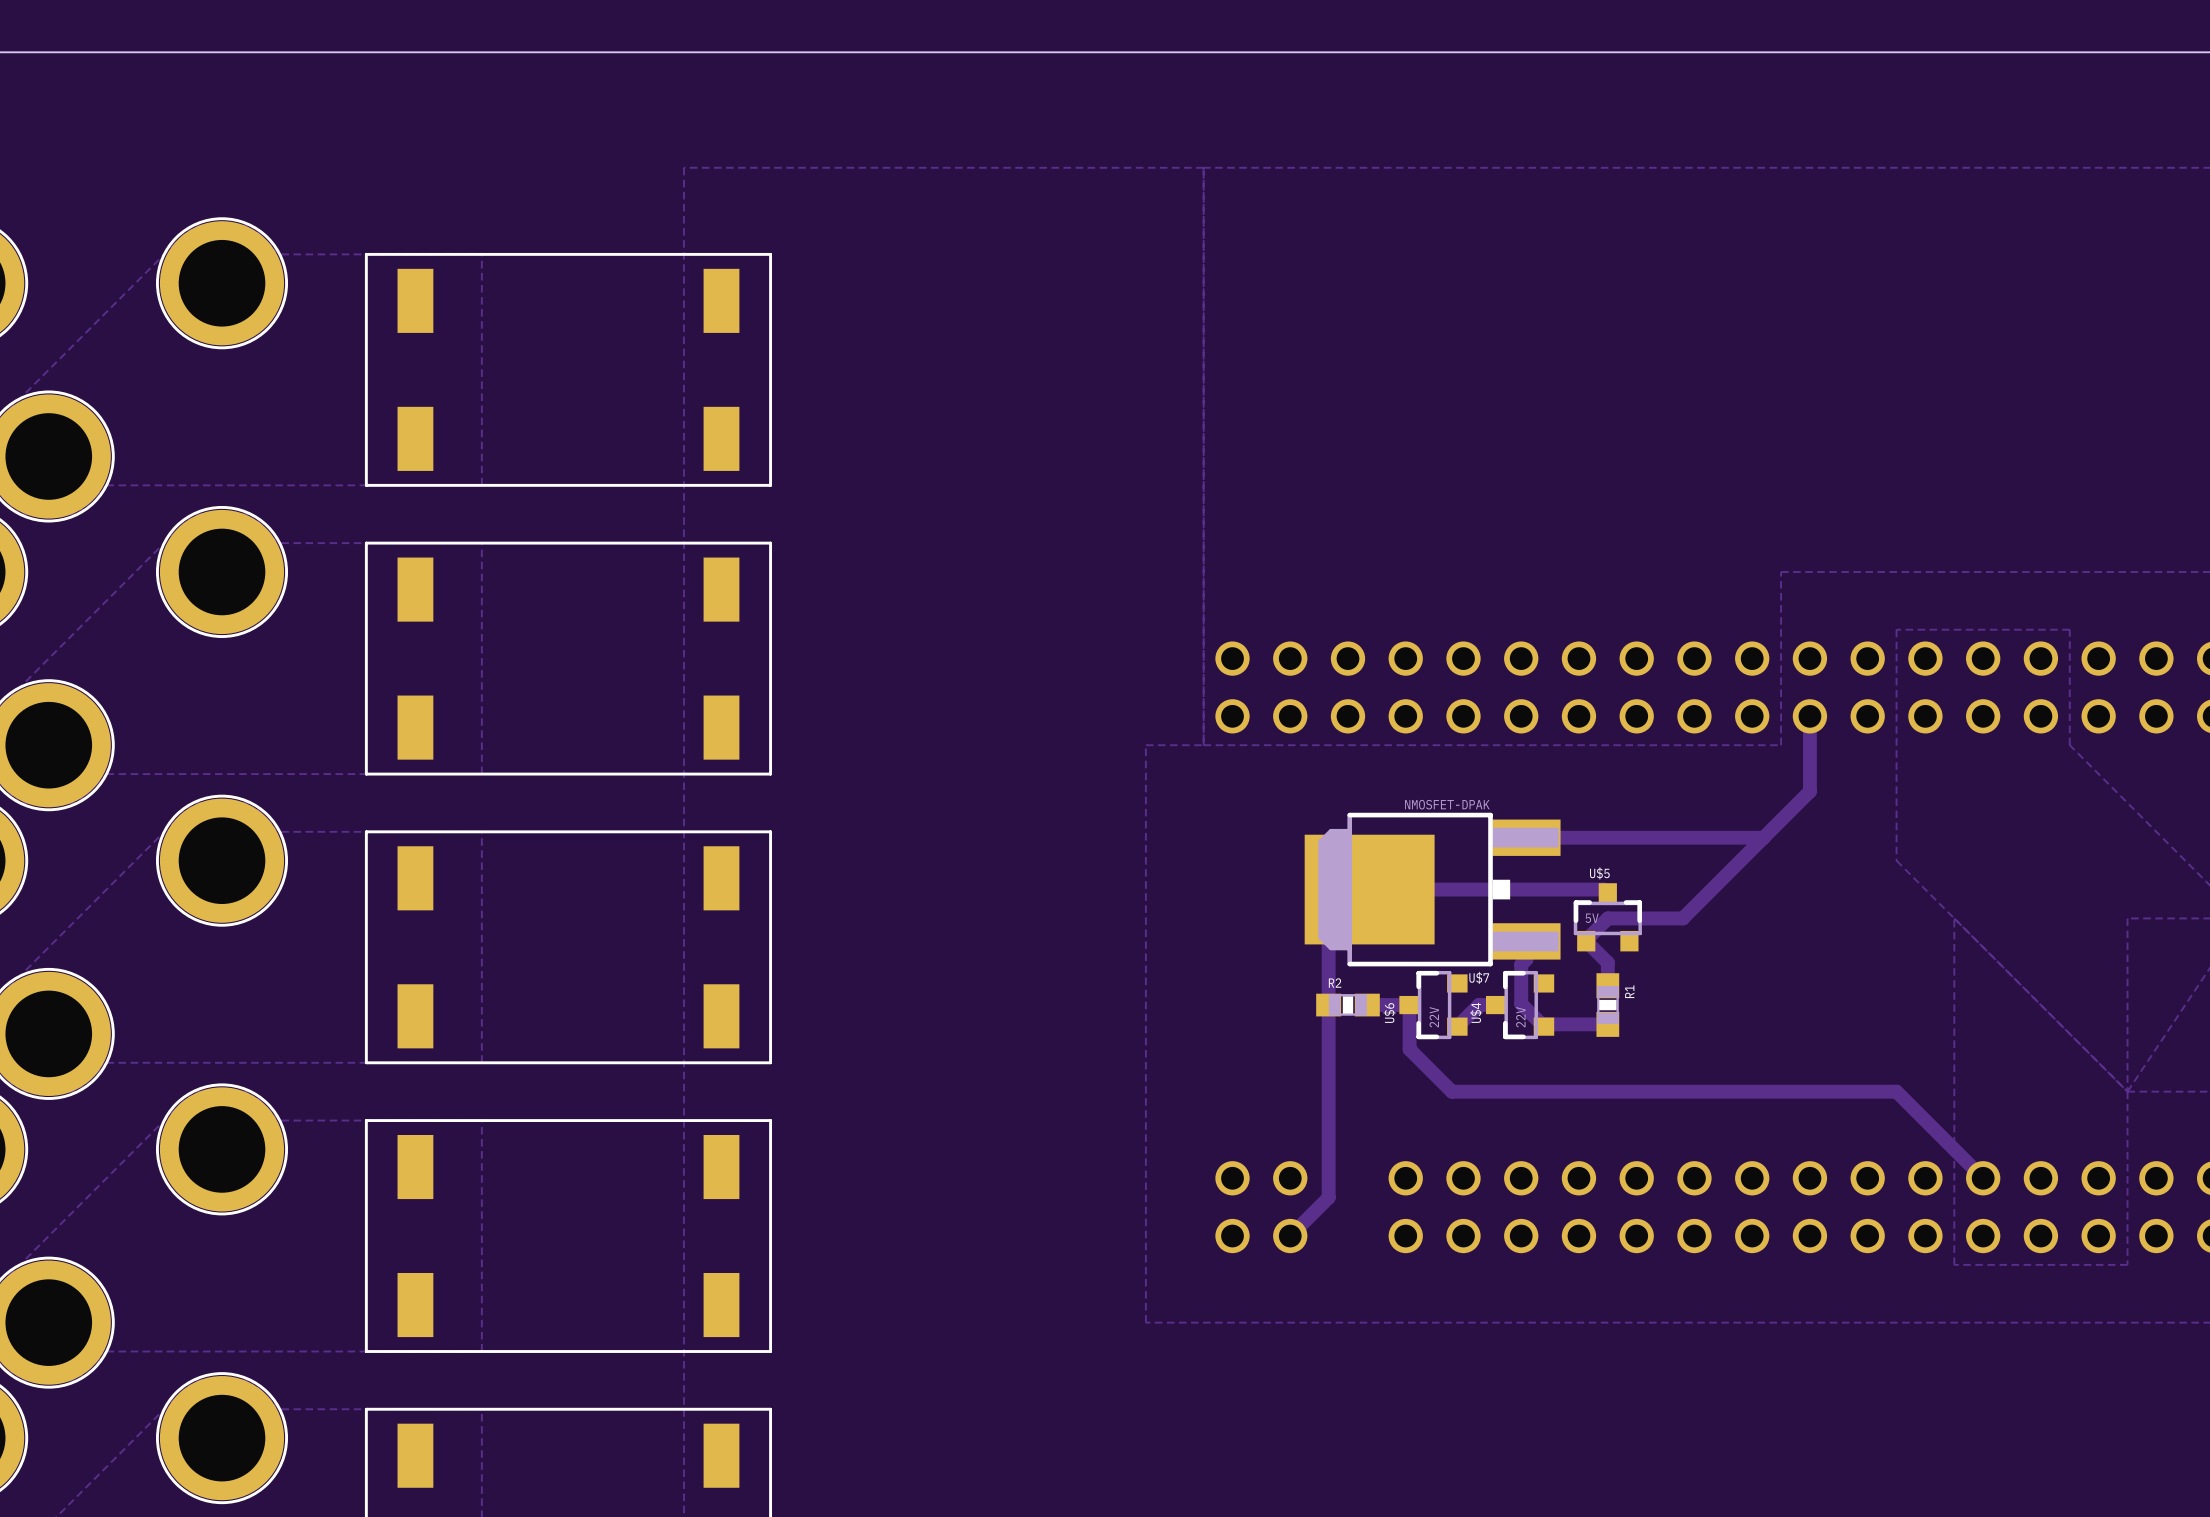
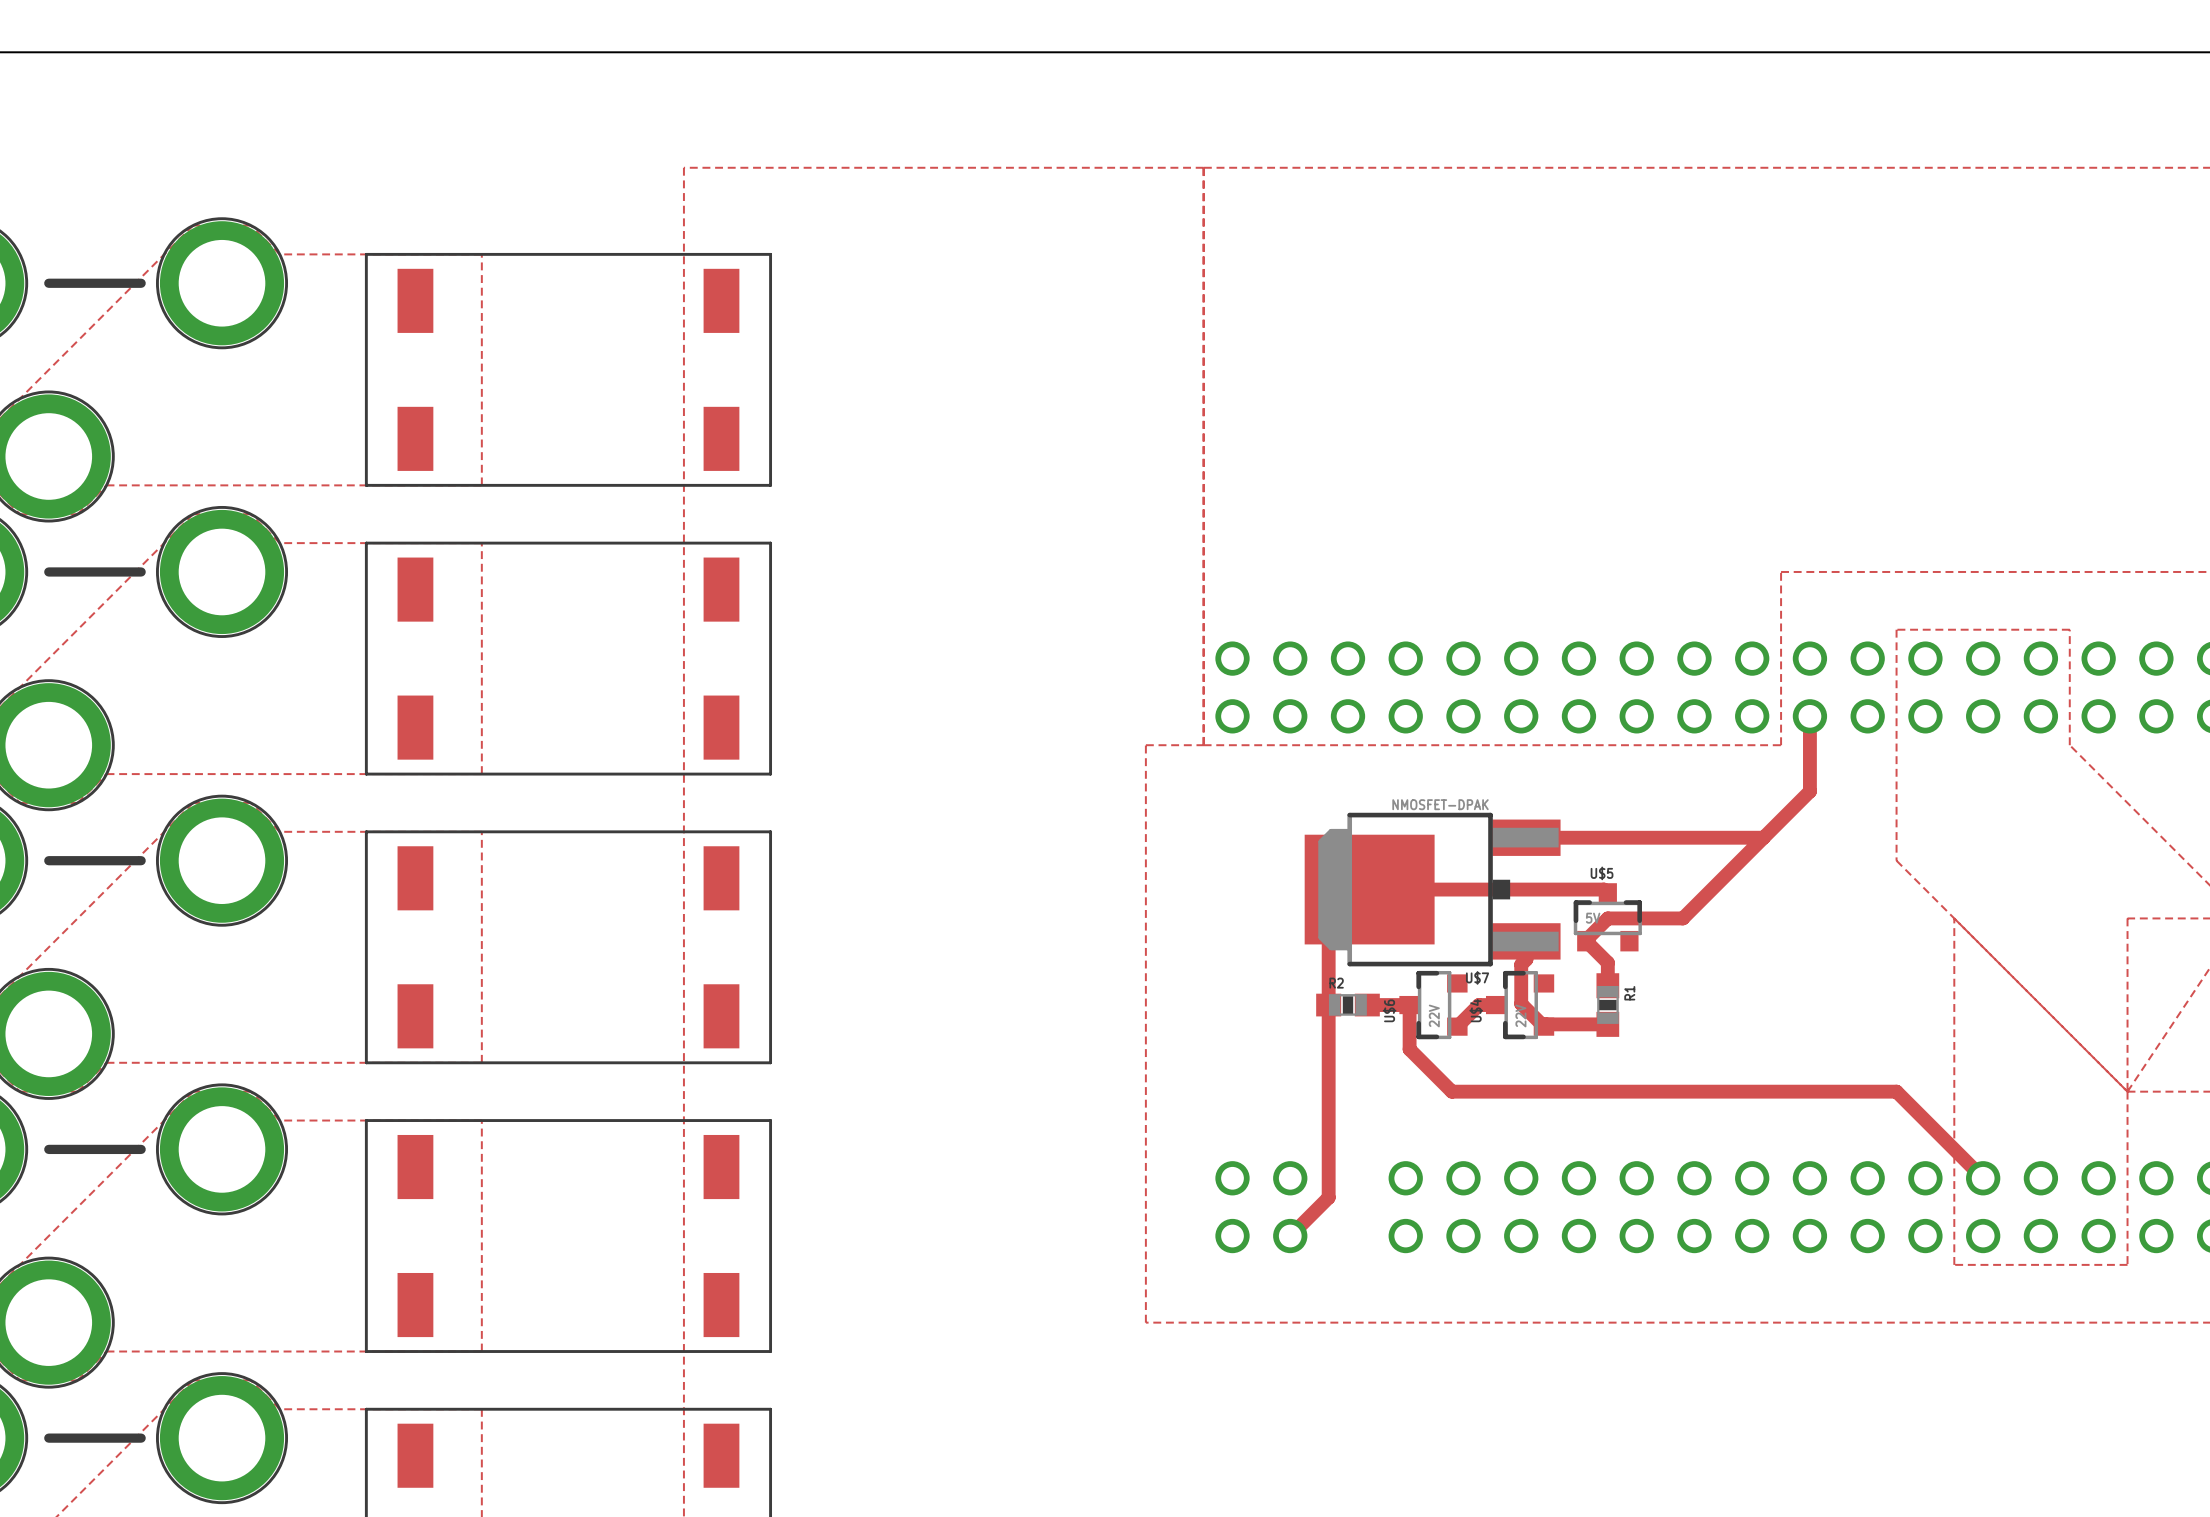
line: none -> (48, 283) (141, 283)
line: none -> (48, 571) (141, 571)
line: none -> (48, 860) (141, 860)
line: none -> (48, 1149) (141, 1149)
line: none -> (48, 1438) (141, 1438)

